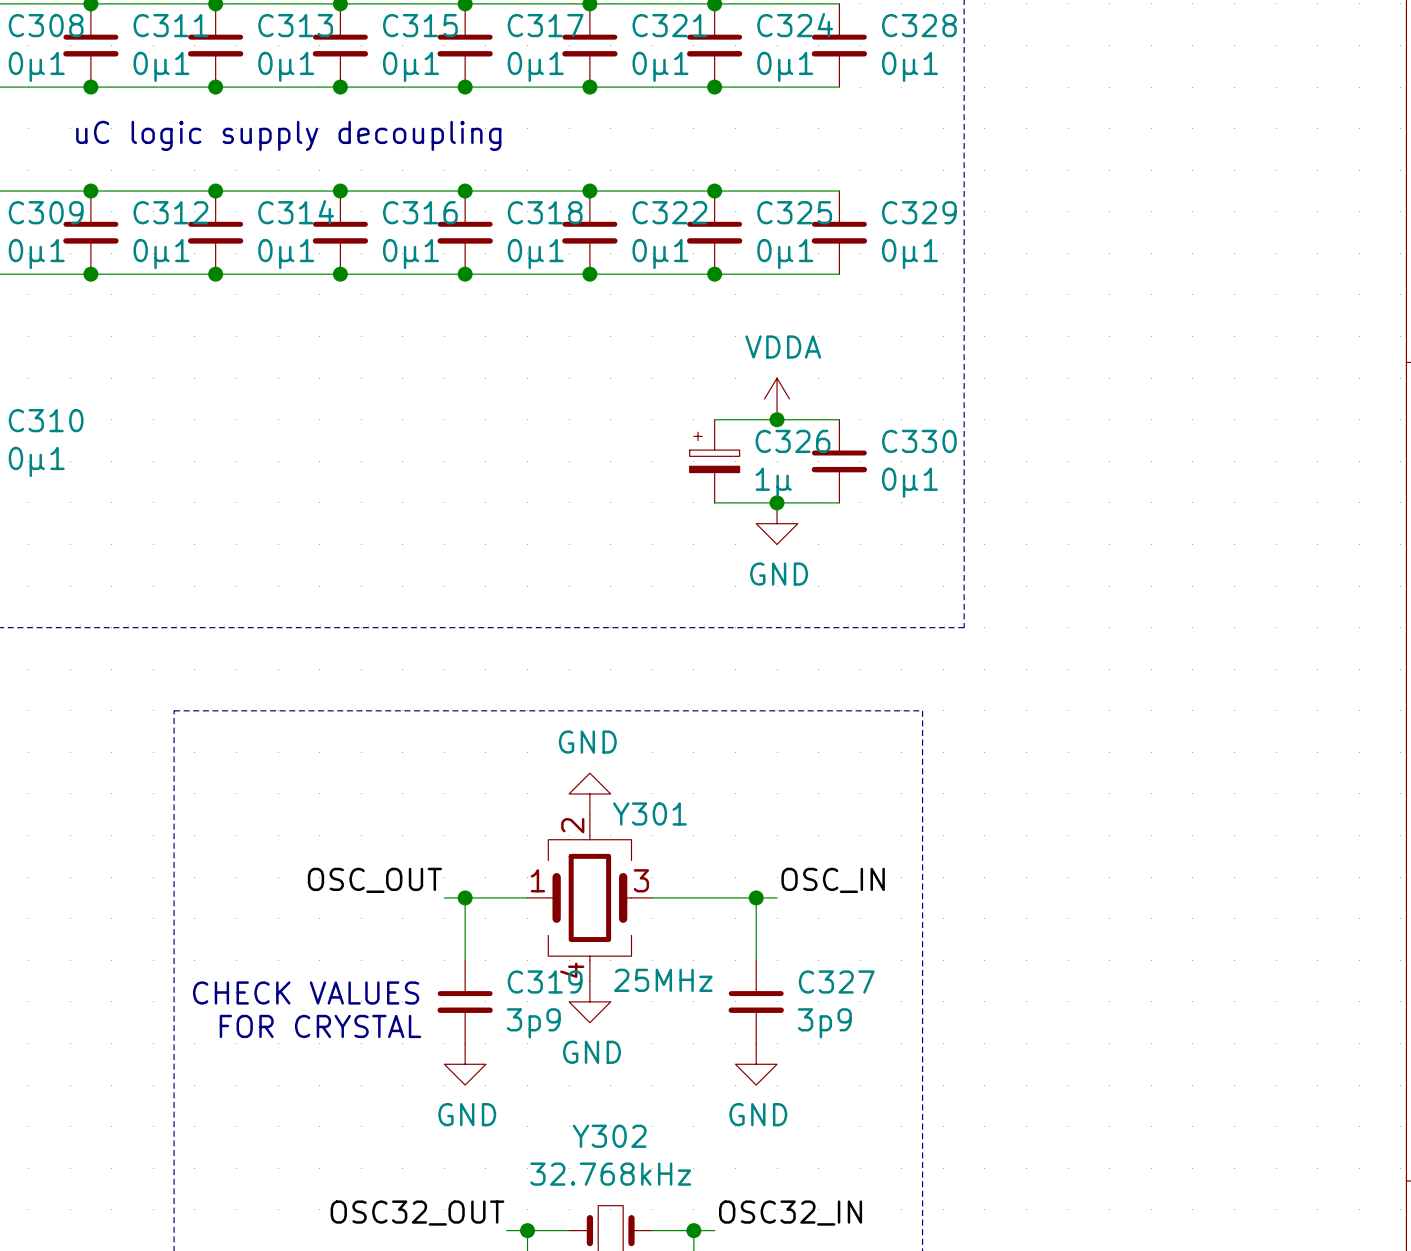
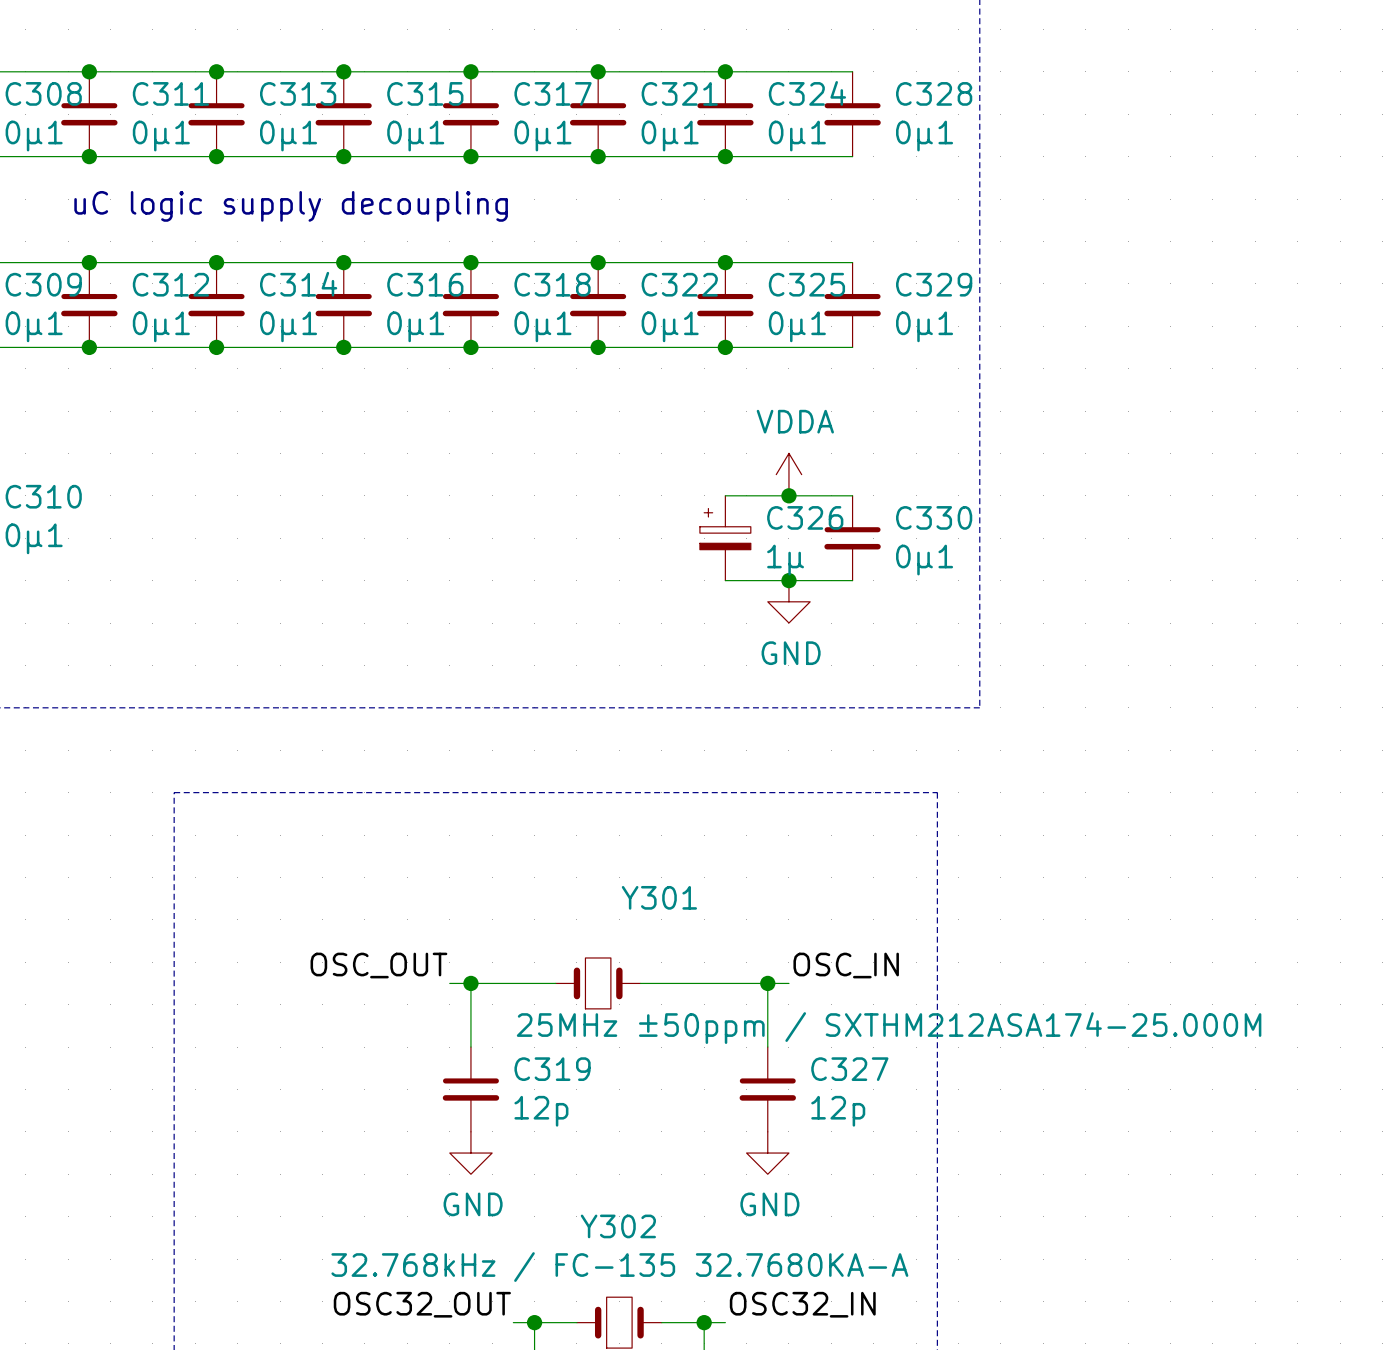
power symbol: GND (589, 793) -> none
Y301 symbol: [527, 814, 653, 982] -> [555, 957, 641, 1009]
Y301 value: 25MHz (663, 980) -> 25MHz ±50ppm / SXTHM212ASA174-25.000M (889, 1028)
text: CHECK VALUES (306, 992) -> none
power symbol: GND (589, 1001) -> none
C319 value: 3p9 (533, 1023) -> 12p (541, 1111)
C327 value: 3p9 (824, 1023) -> 12p (838, 1111)
text: FOR CRYSTAL (320, 1026) -> none
Y302 value: 32.768kHz (610, 1174) -> 32.768kHz / FC-135 32.7680KA-A (619, 1267)

